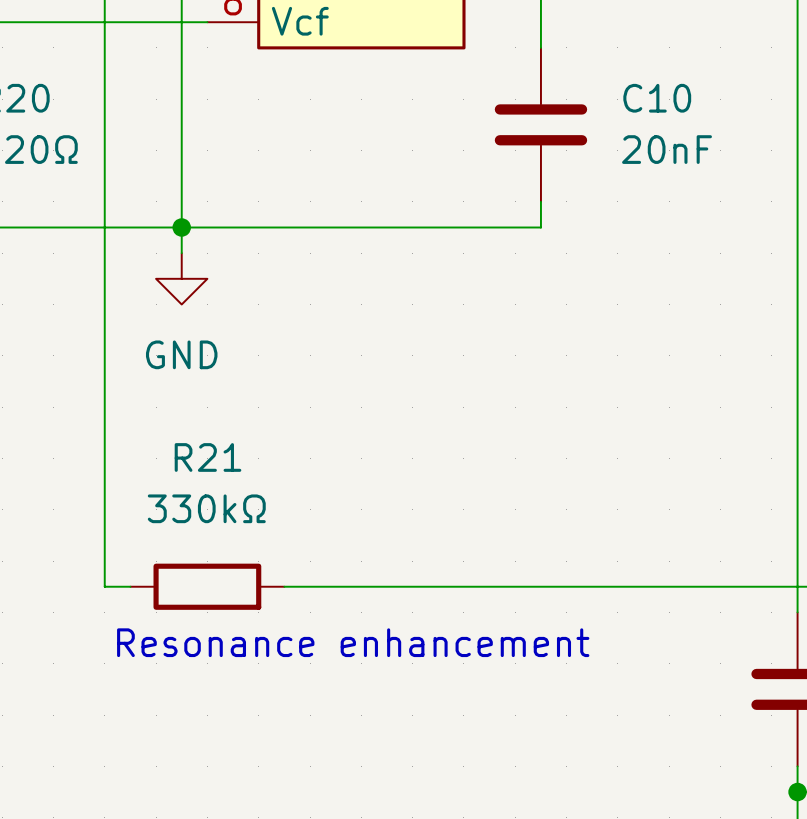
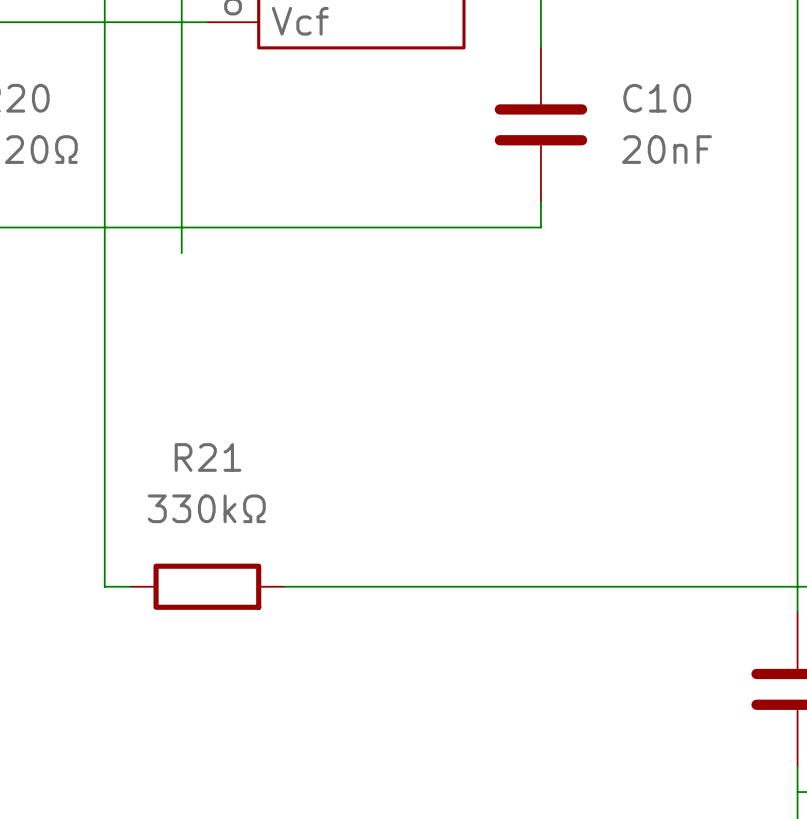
junction: (181, 227) -> none
power symbol: GND (181, 278) -> none
text: Resonance enhancement (353, 642) -> none
junction: (797, 792) -> none

